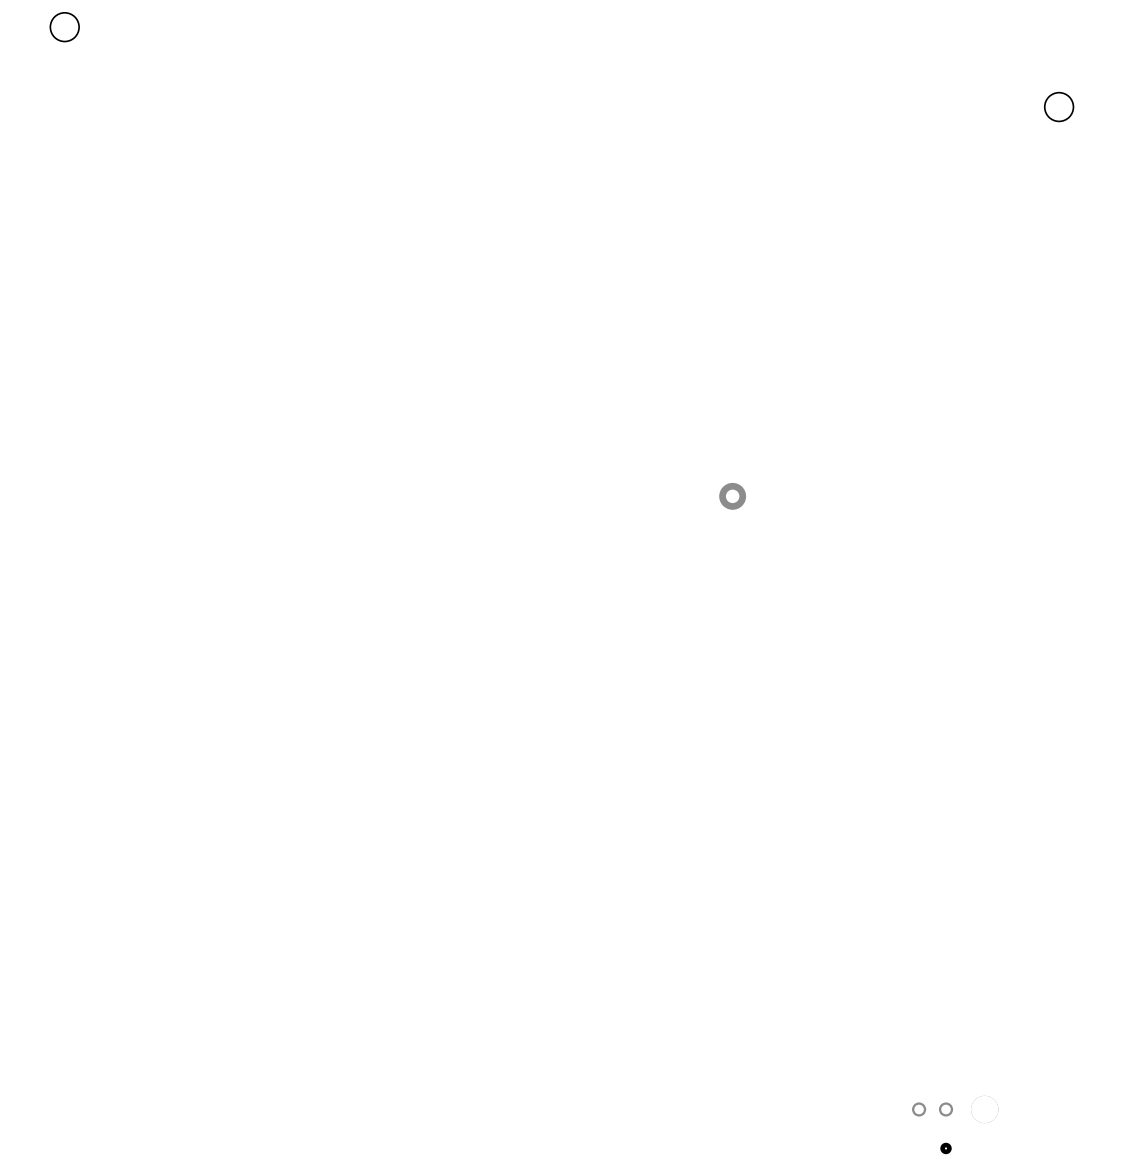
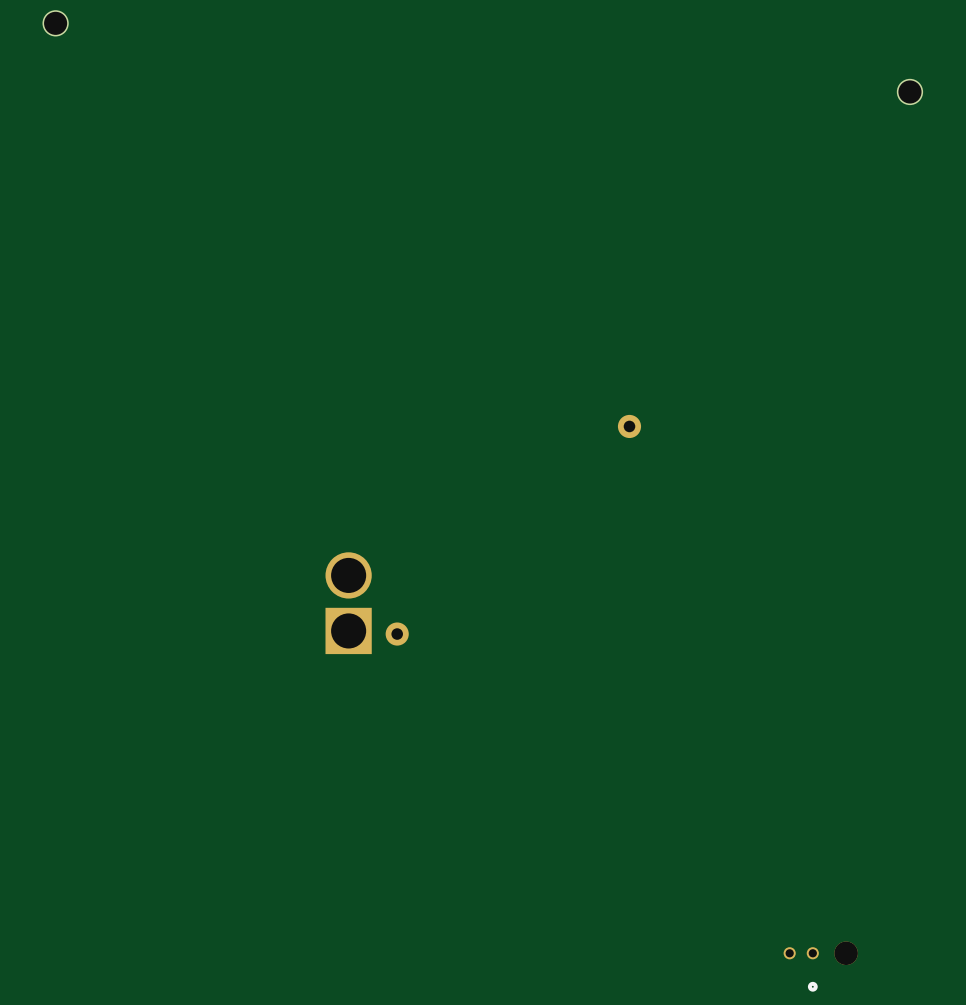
part: none -> (348, 603)
part: none -> (397, 634)

